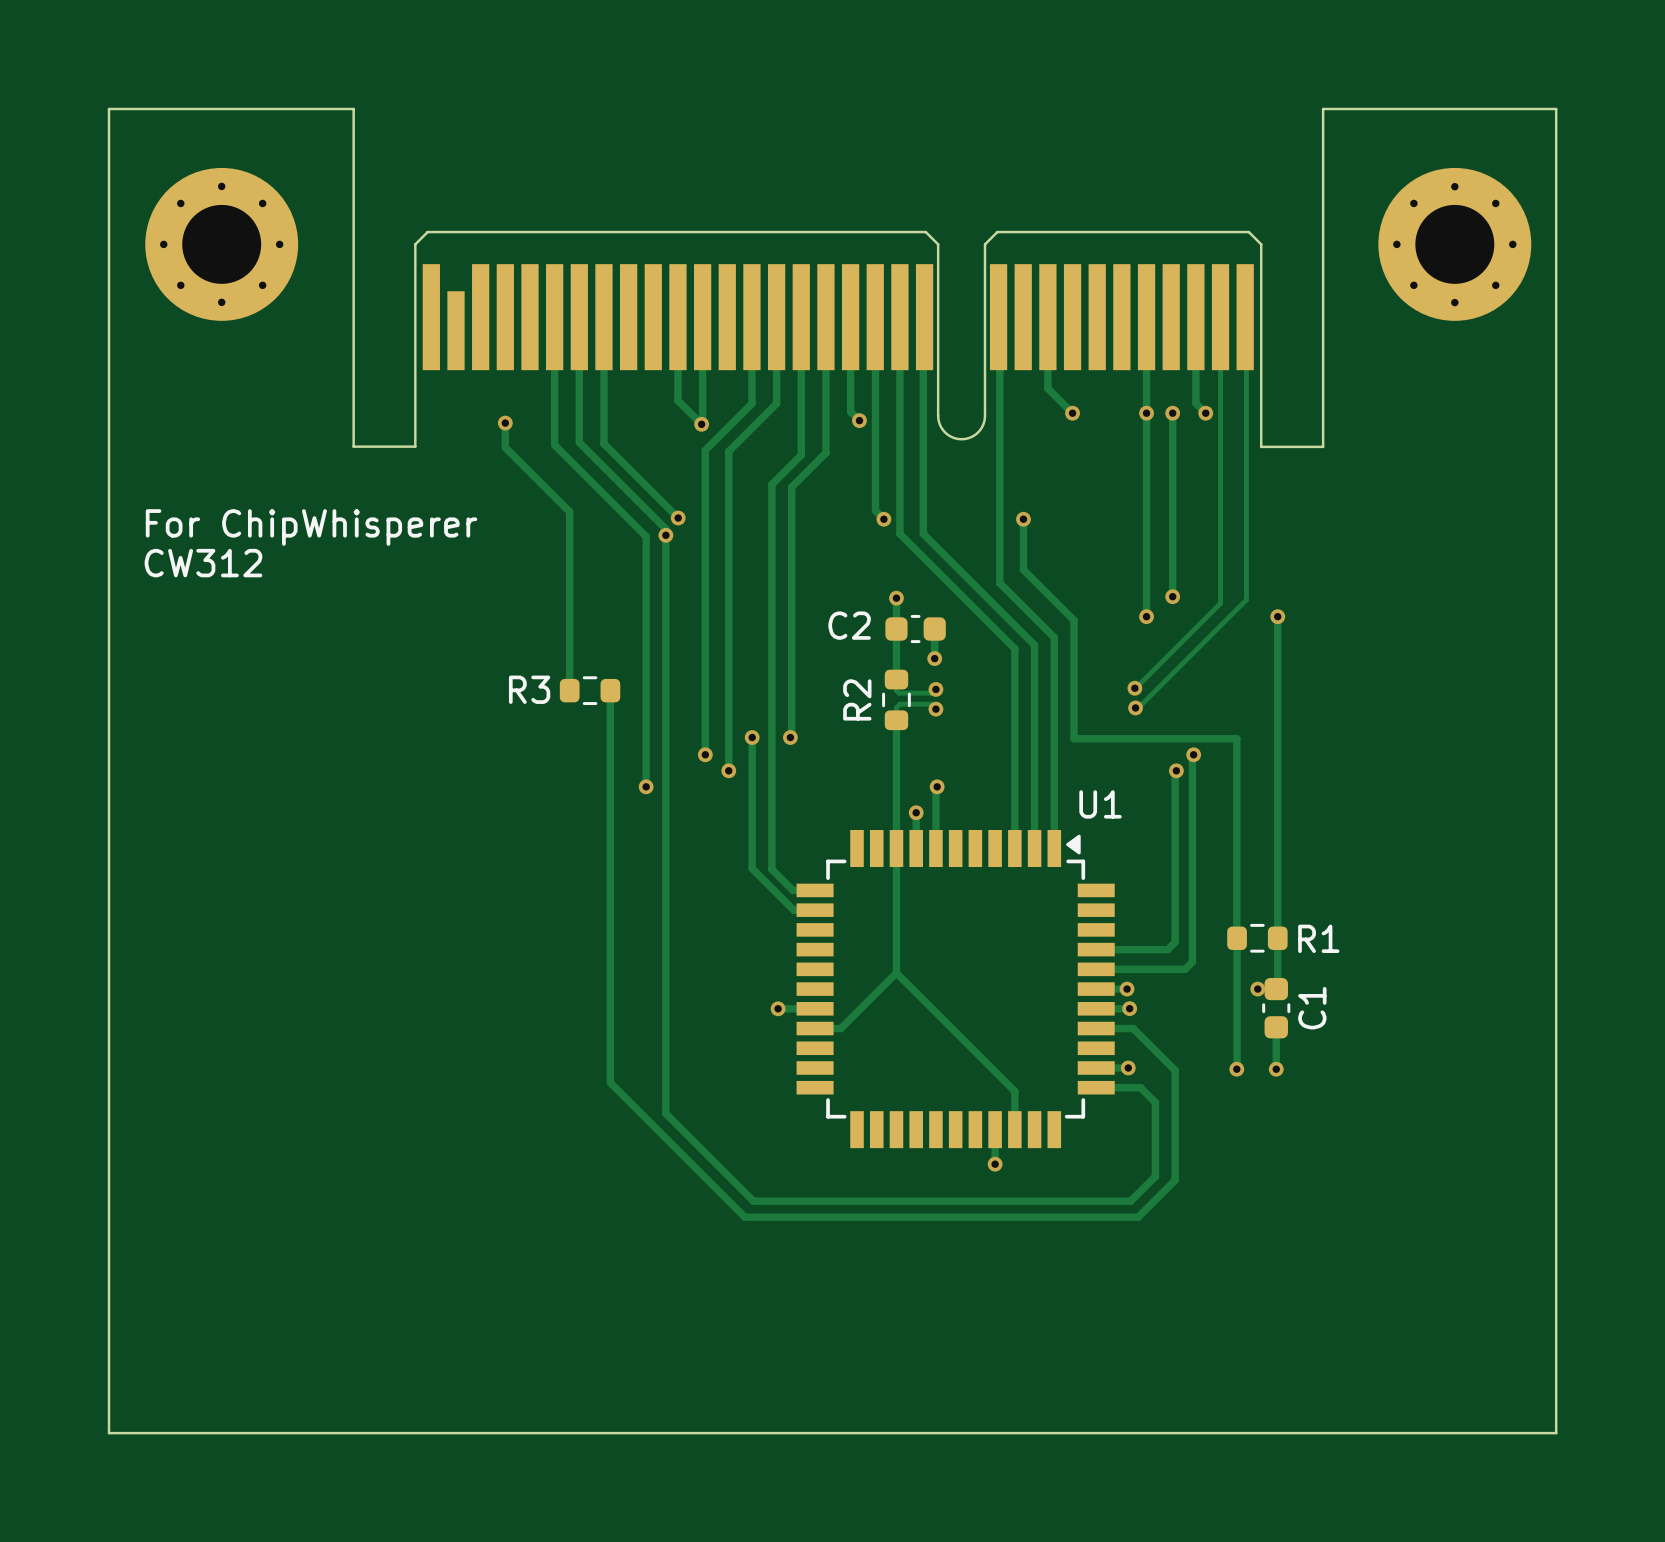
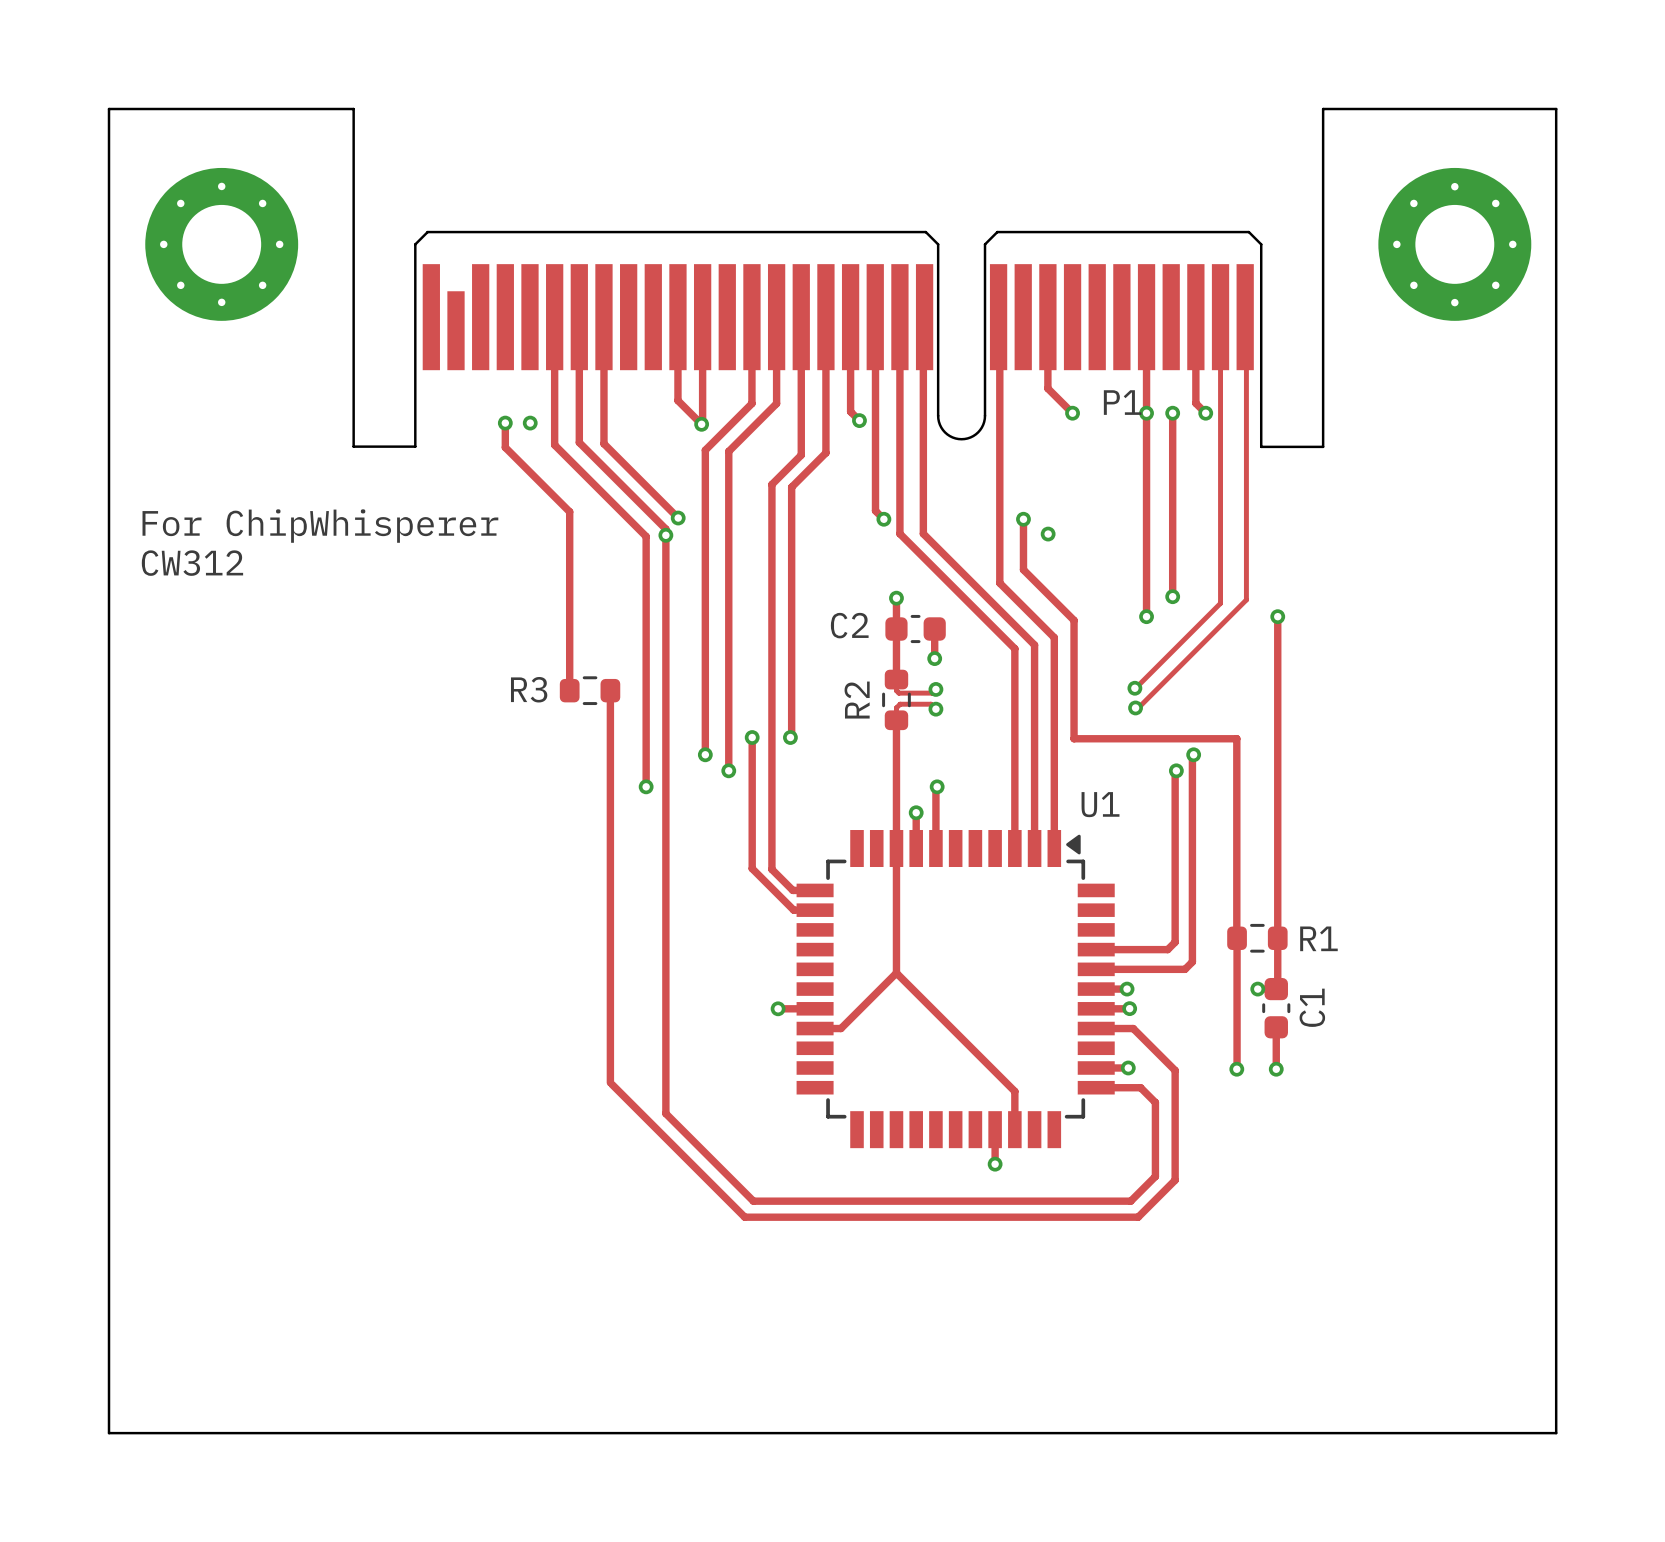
P1 name: none -> P1 (1122, 402)
via: none -> (530, 423)
via: none -> (1048, 534)

